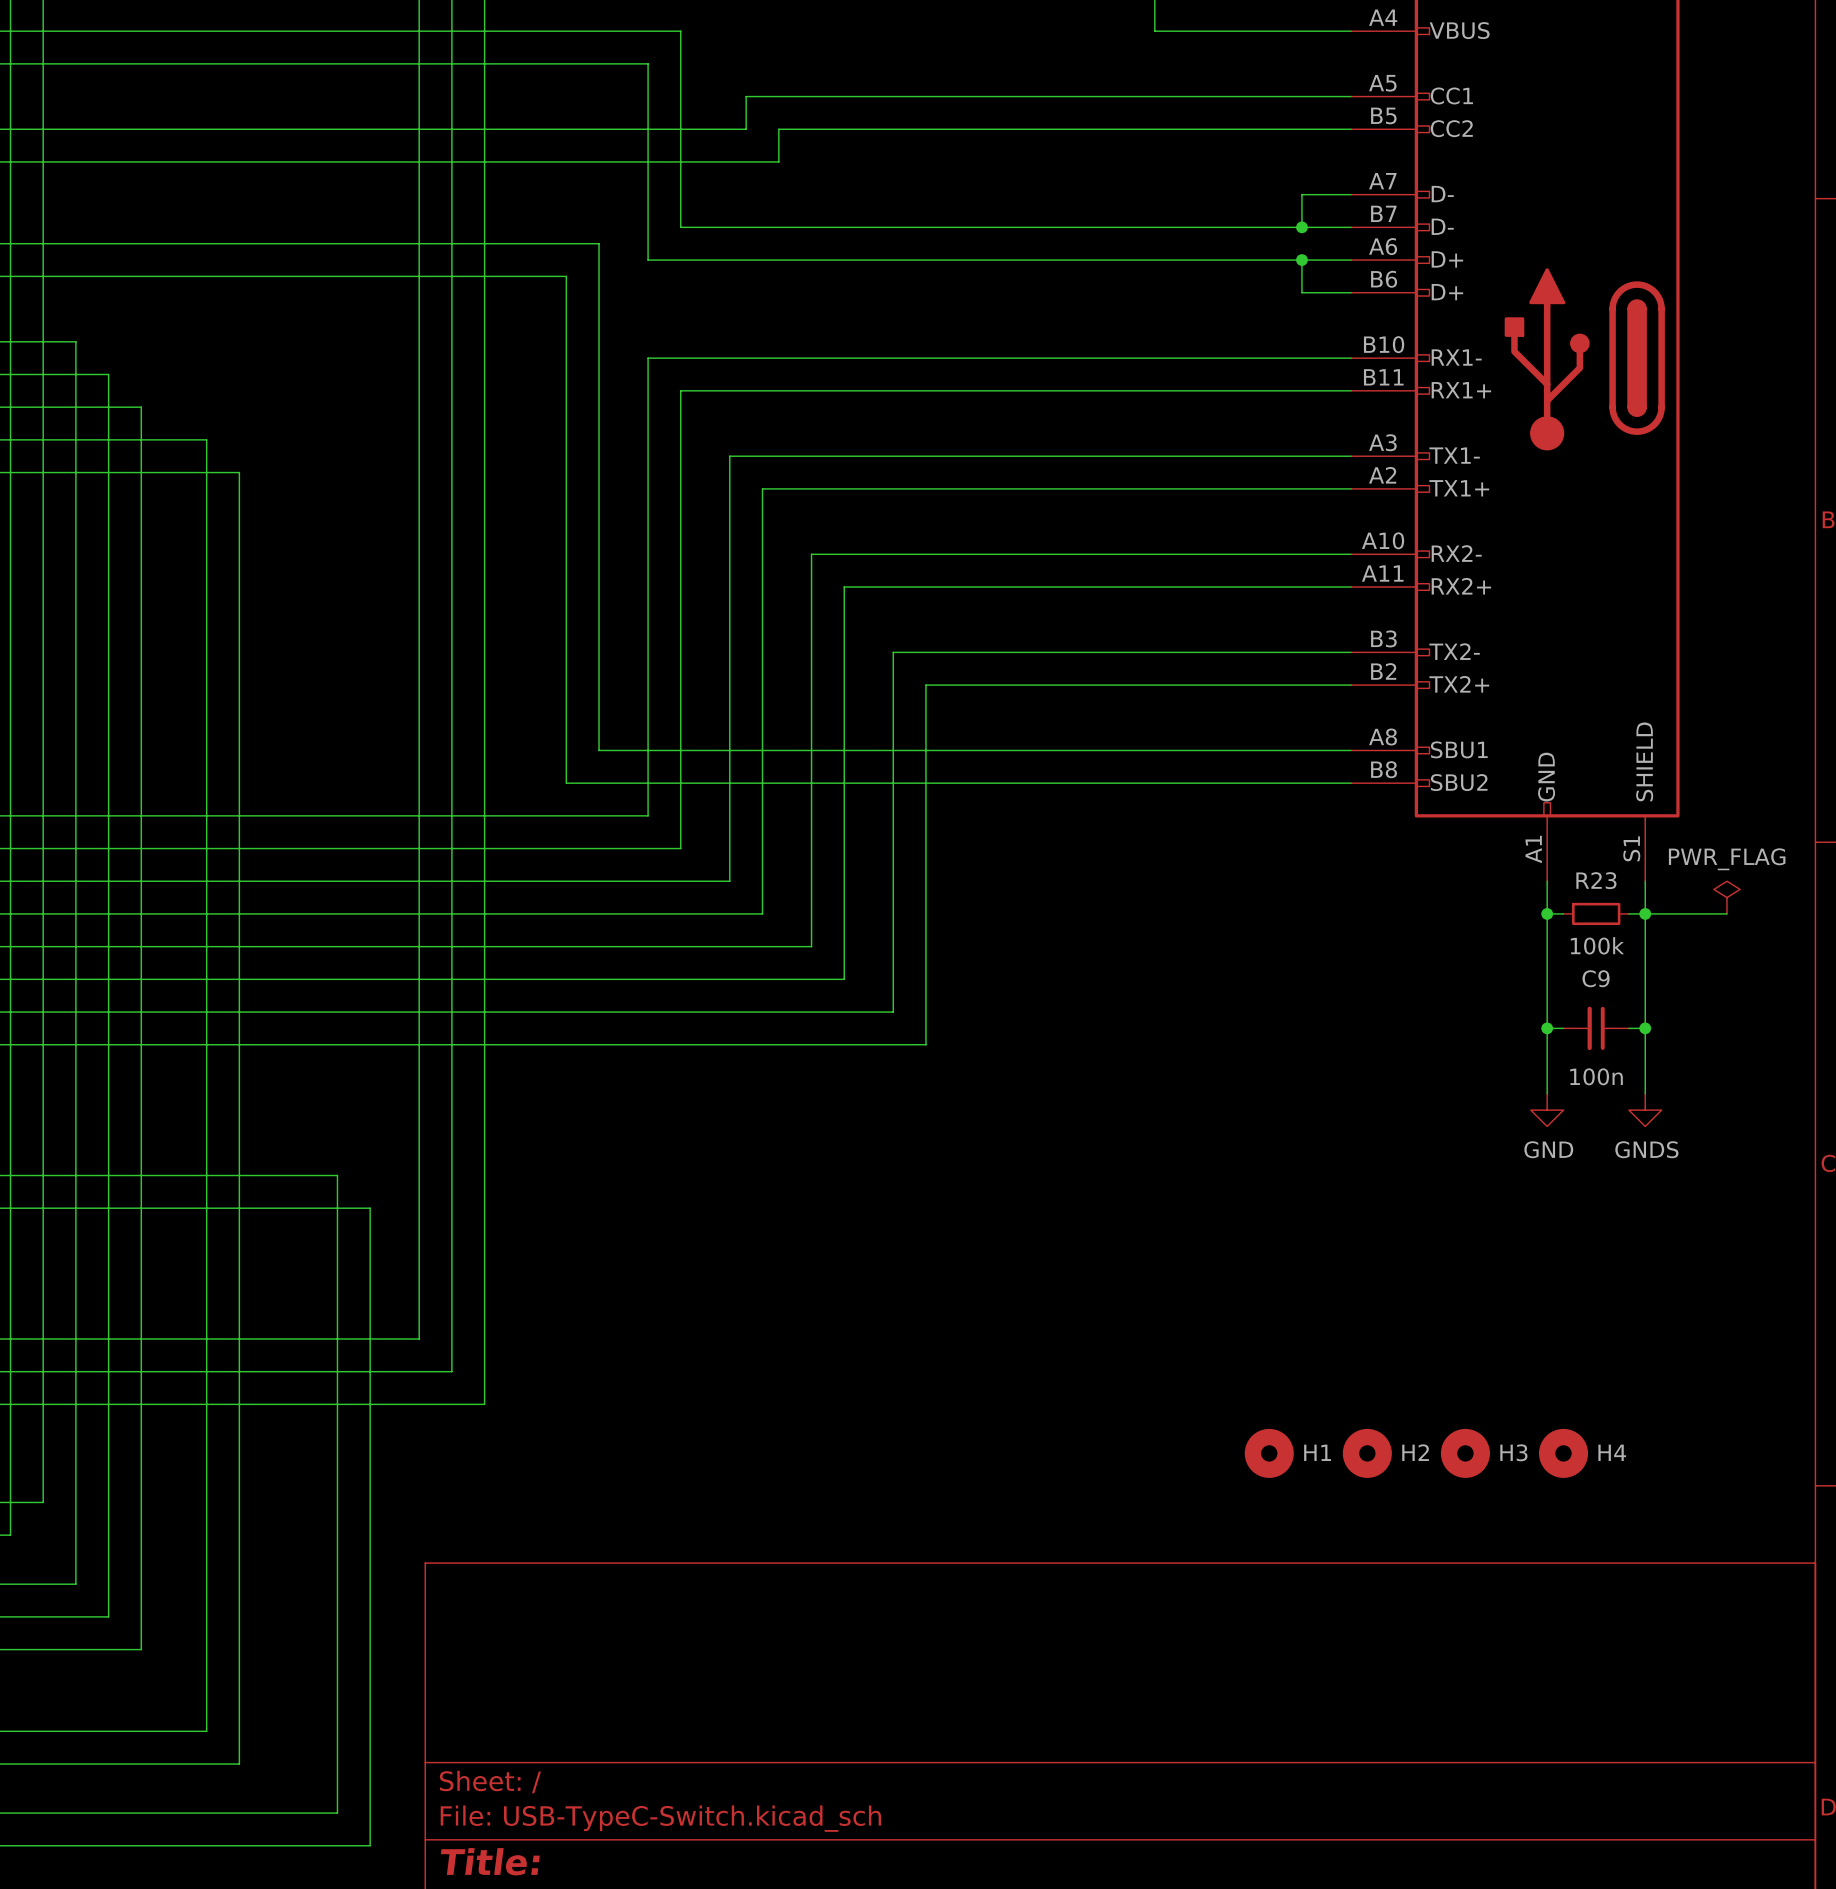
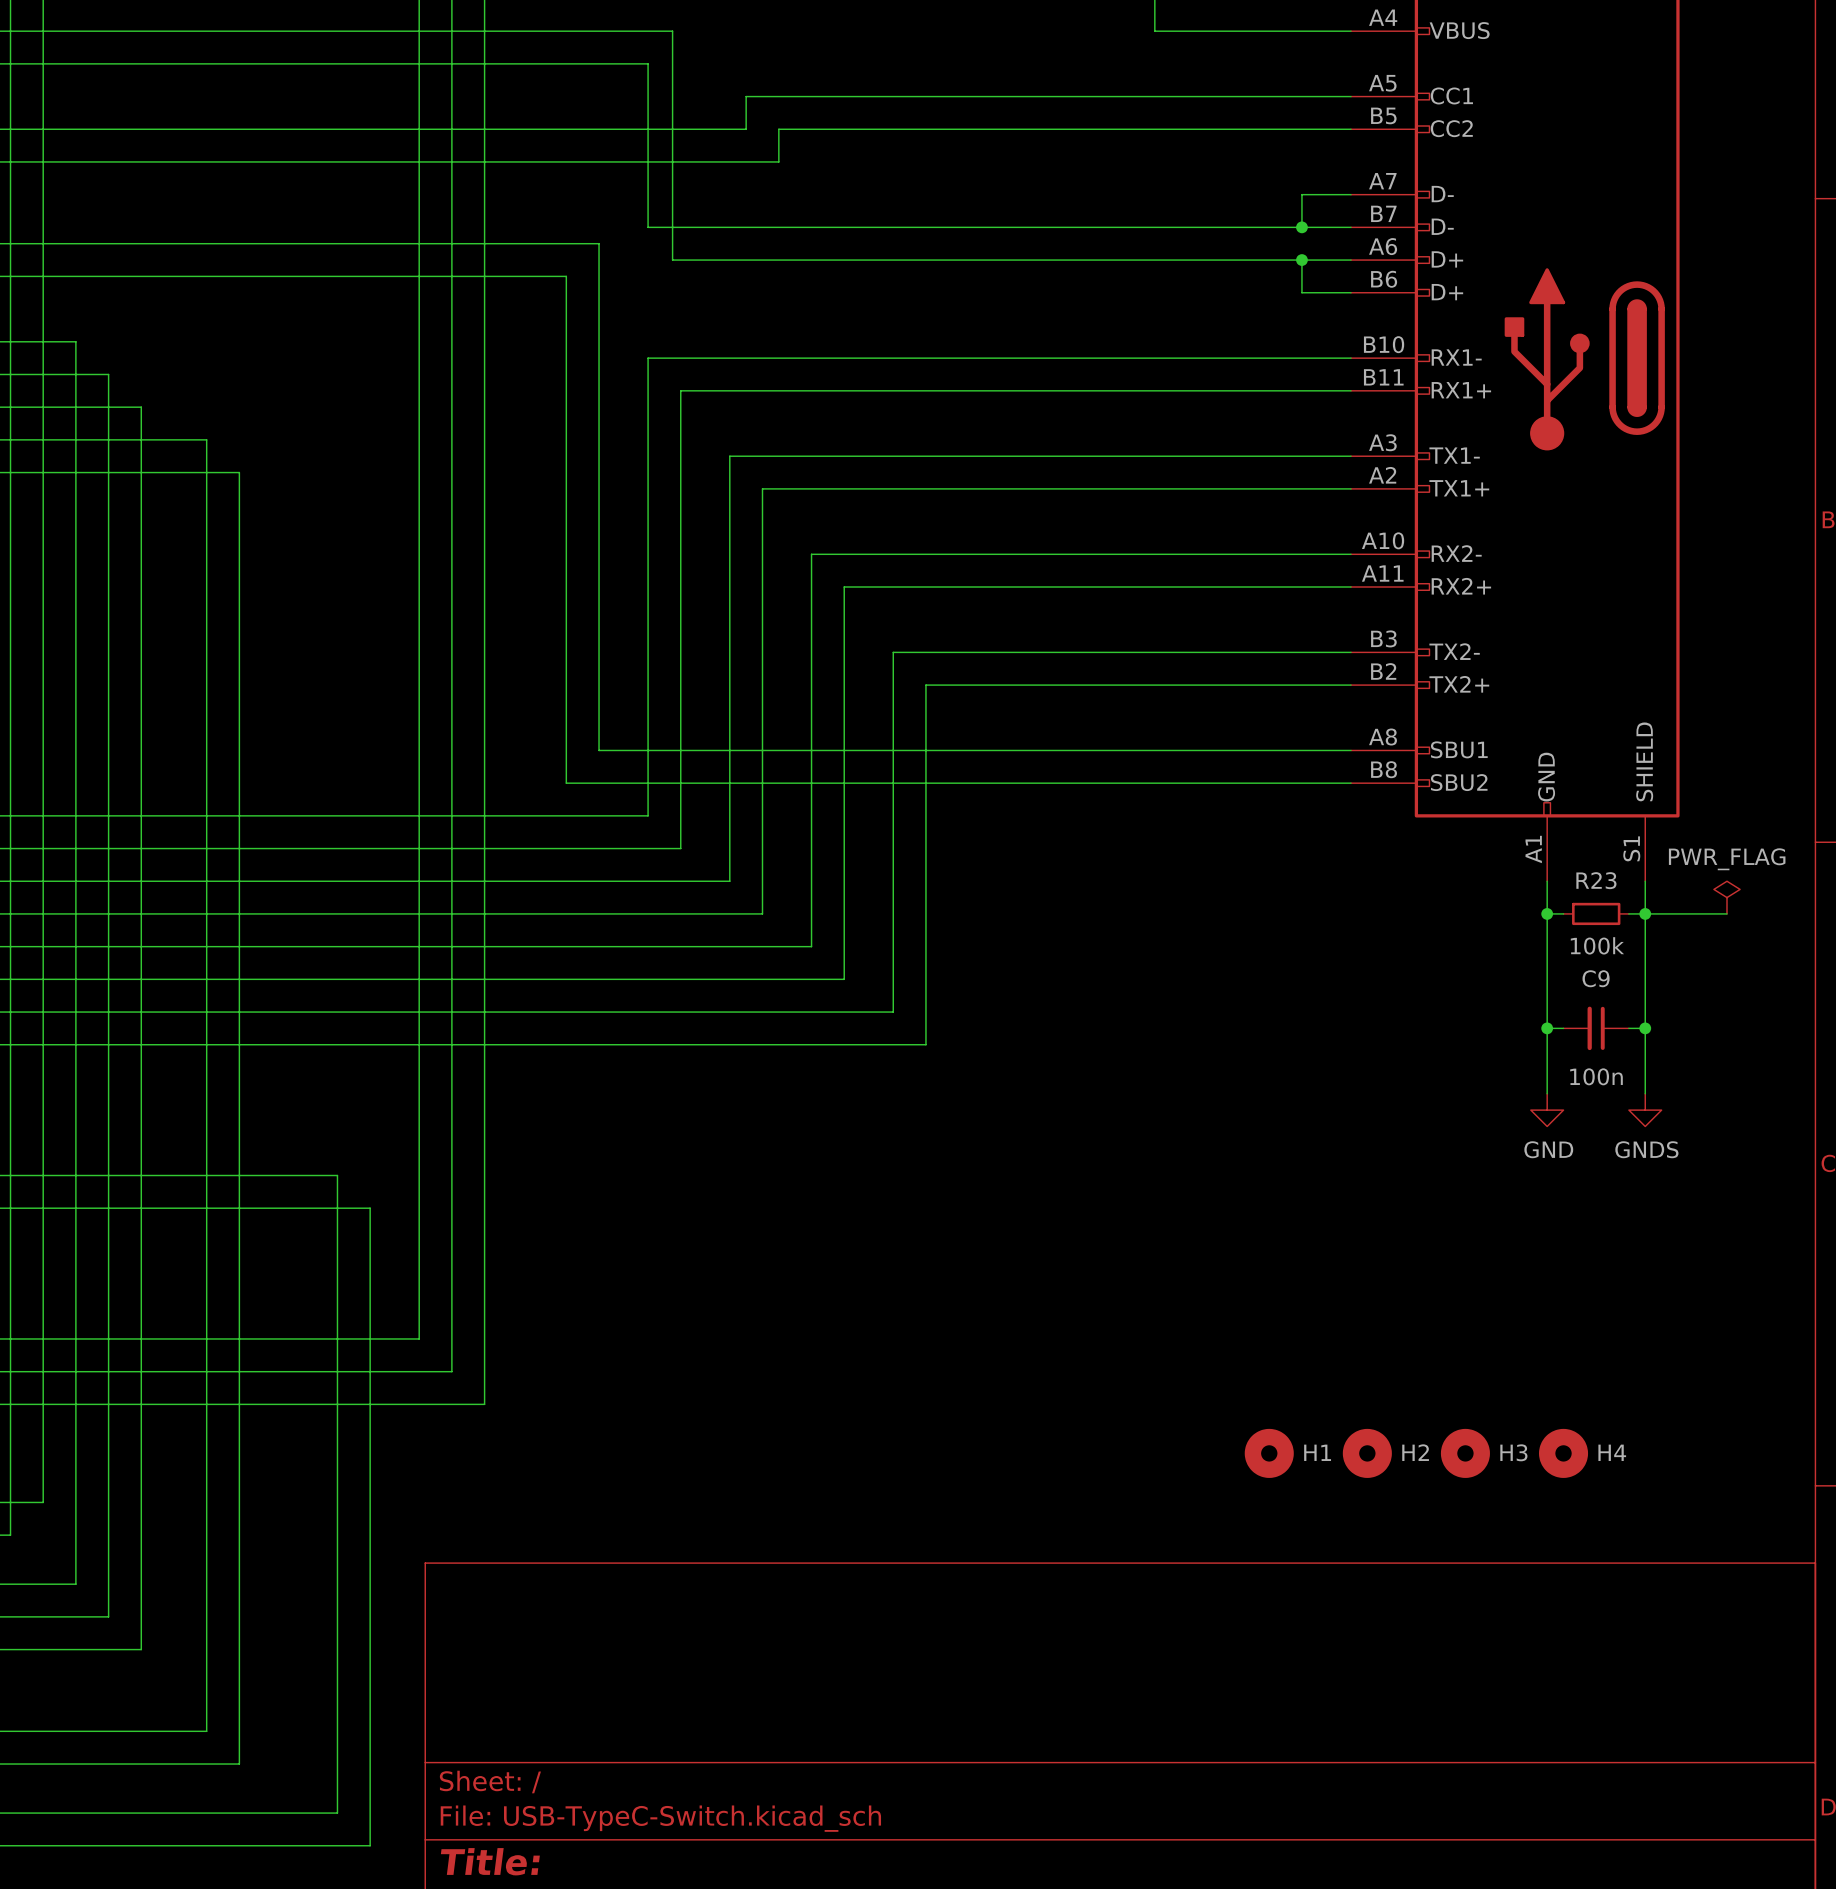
wire: (672, 31) (680, 31) (680, 227) -> (672, 31) (672, 260)
wire: (648, 227) (648, 260) (672, 260) -> (648, 227) (680, 227)

